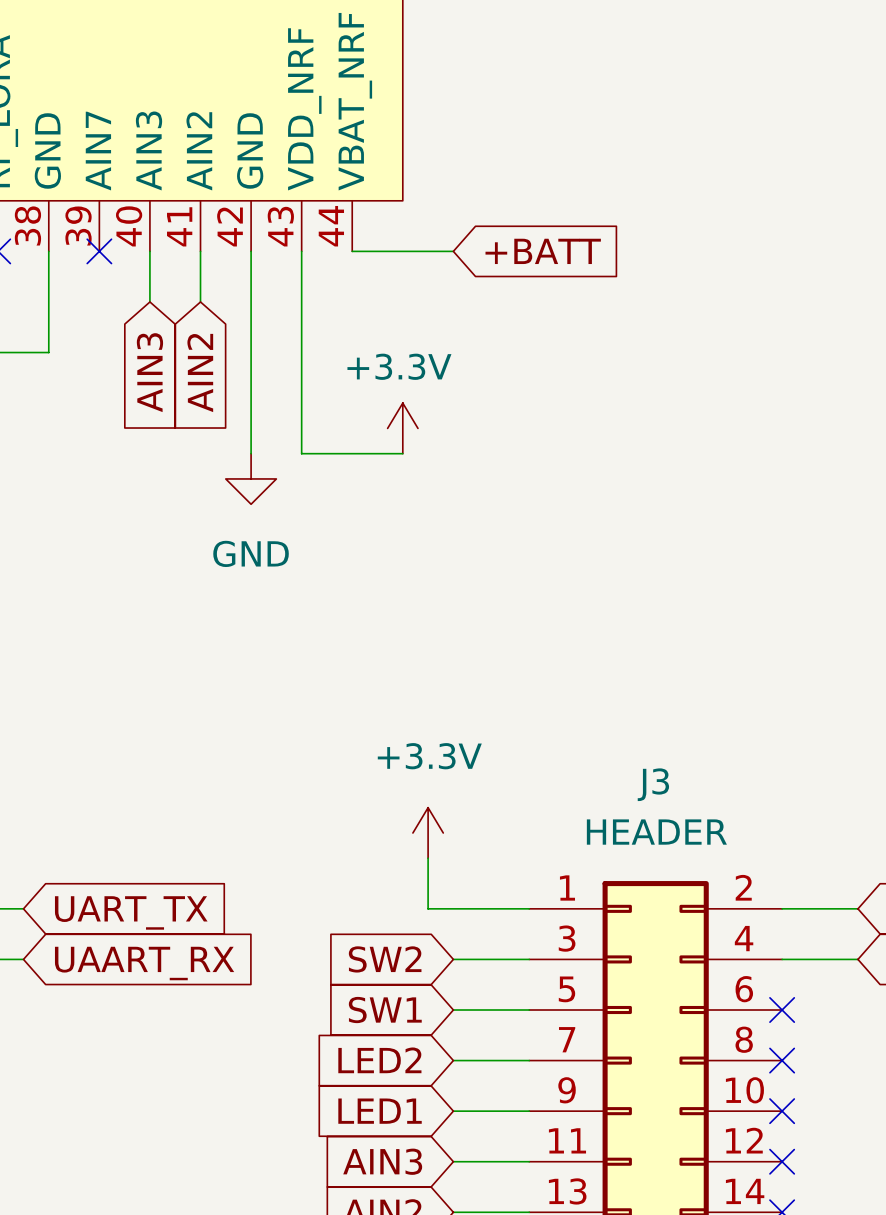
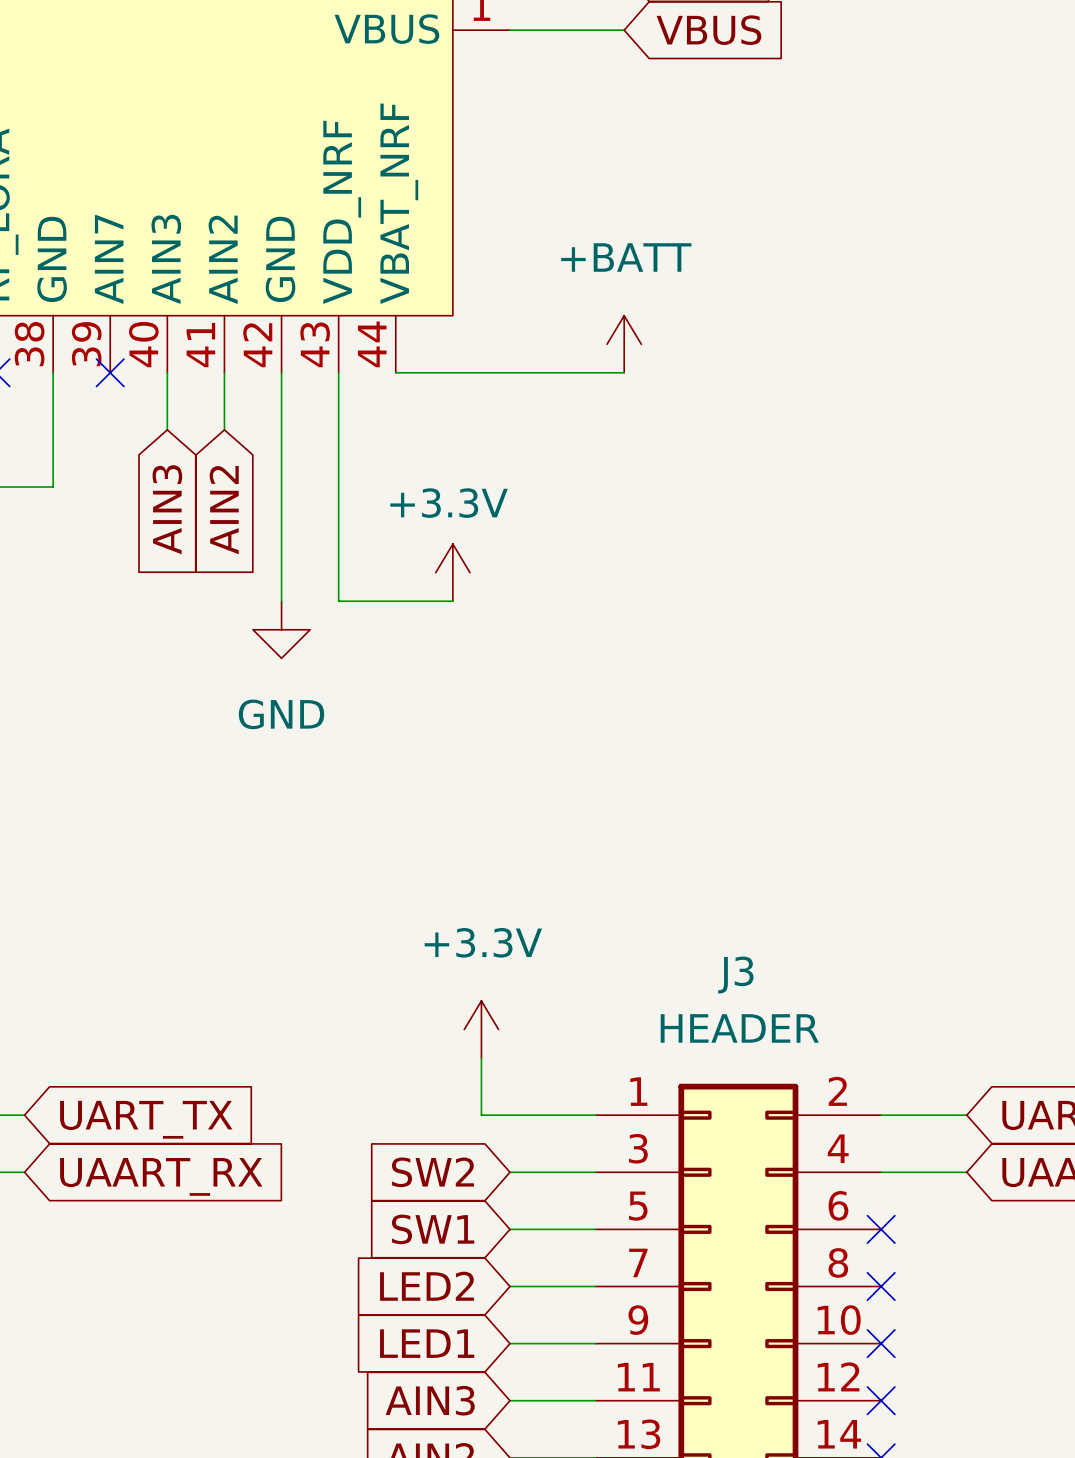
power symbol: none -> +BATT (624, 344)
wire: none -> (509, 372) (624, 372)
global label: +BATT (543, 251) -> none

